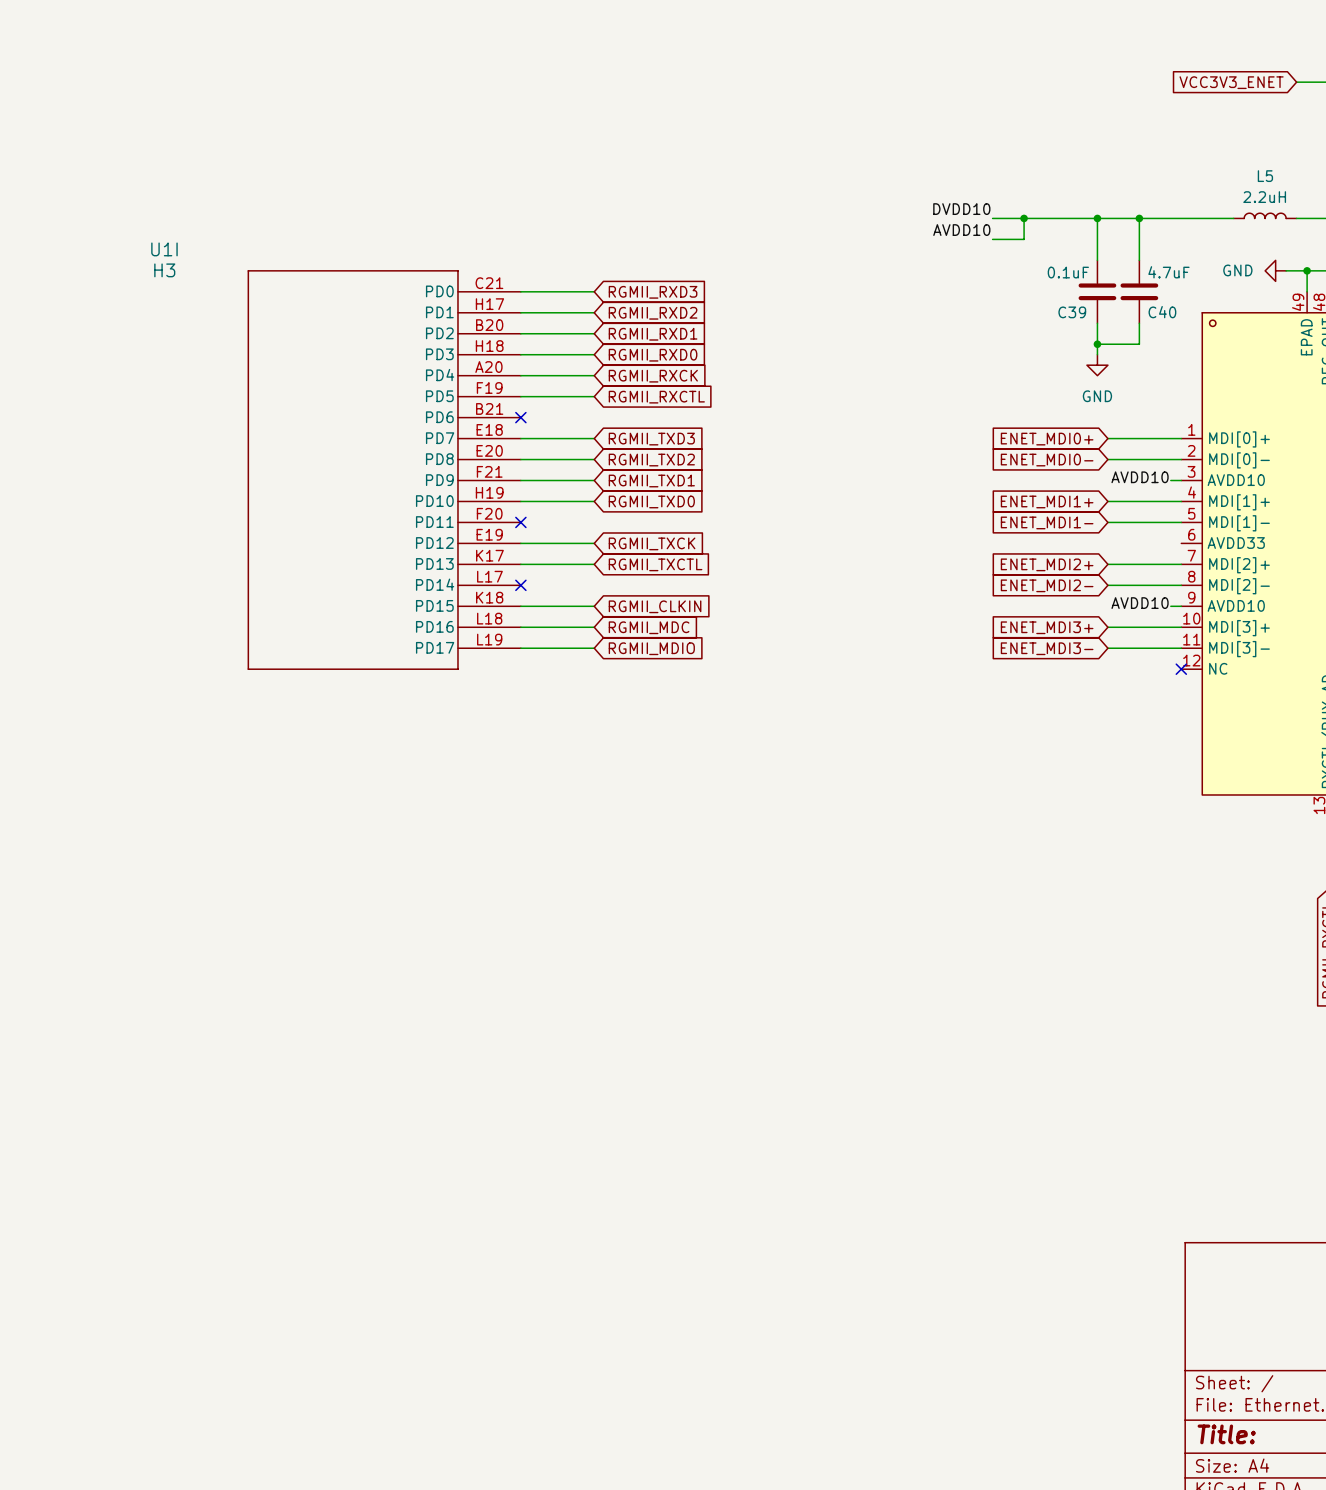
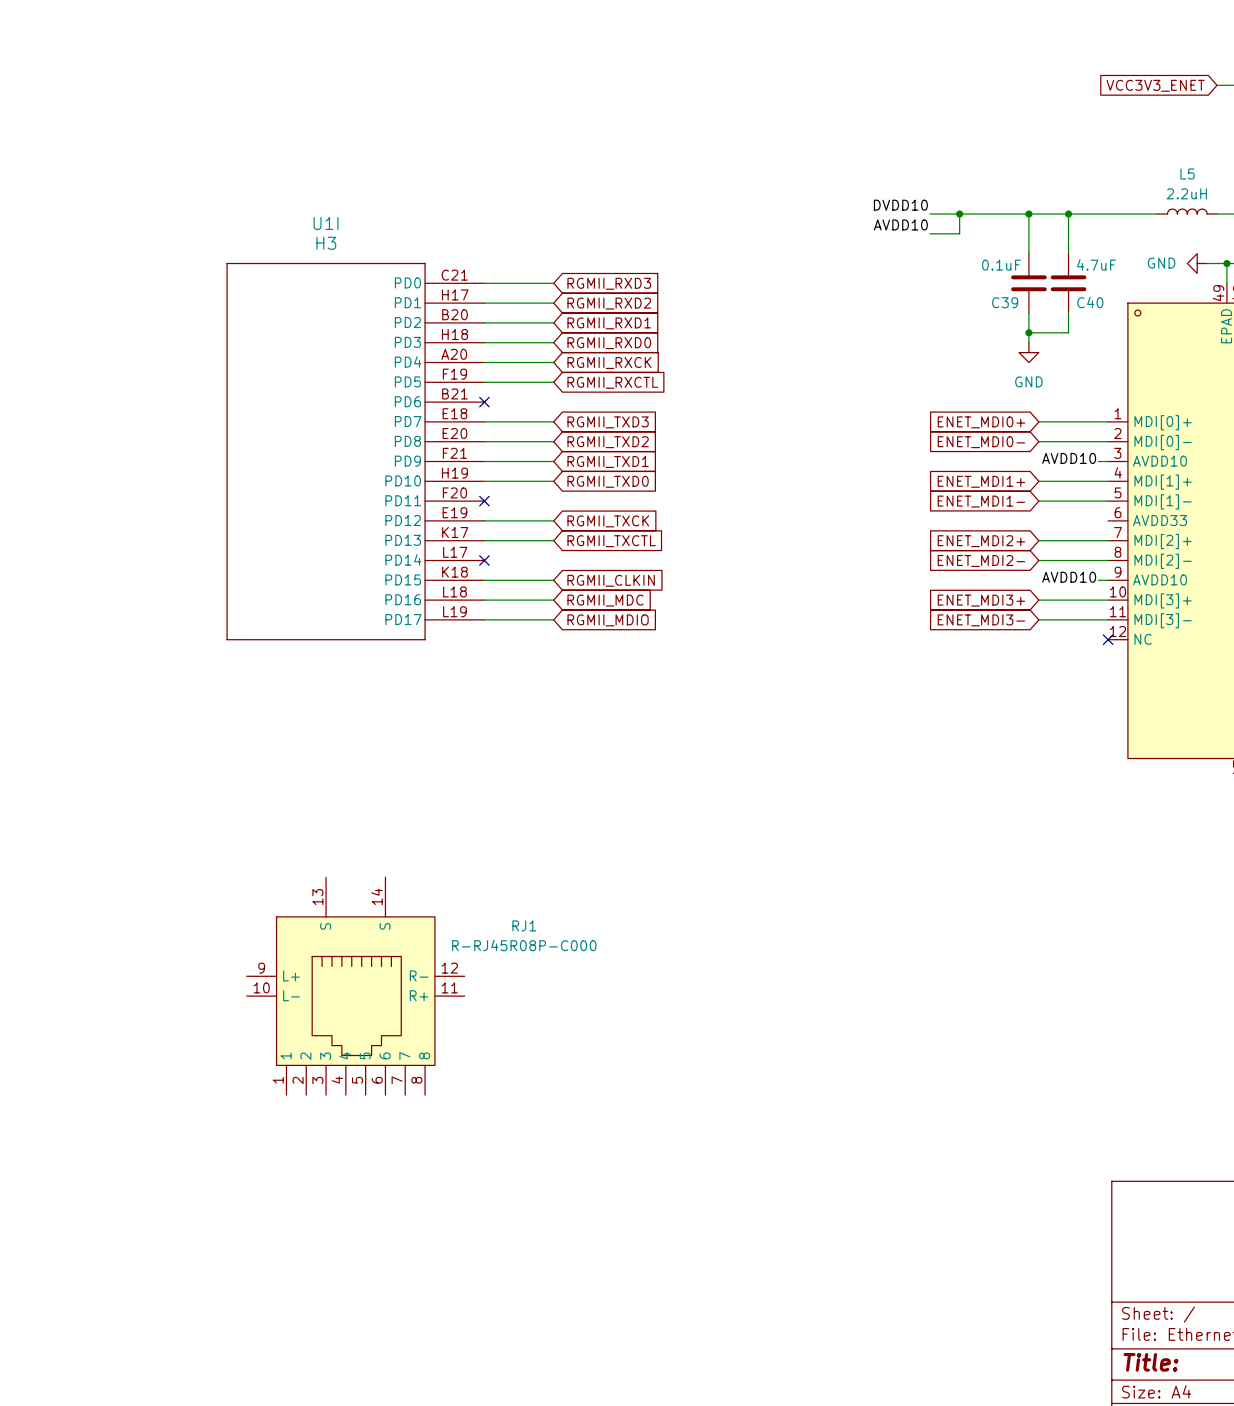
U1I name position: U1I (164, 249) -> U1I (326, 223)
U1I value position: H3 (164, 270) -> H3 (326, 243)
RJ1: none -> R-RJ45R08P-C000 (355, 986)

